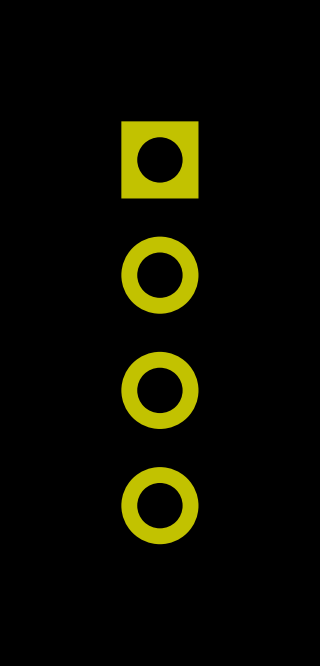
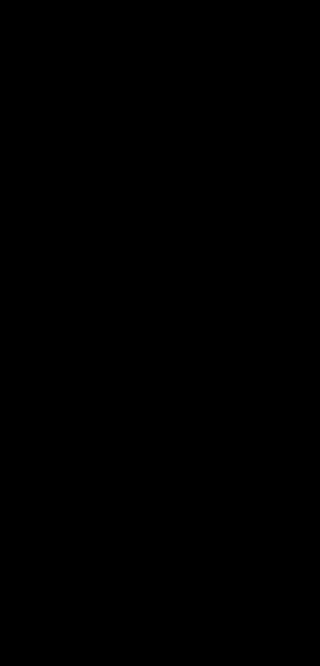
part: (159, 332) -> none

